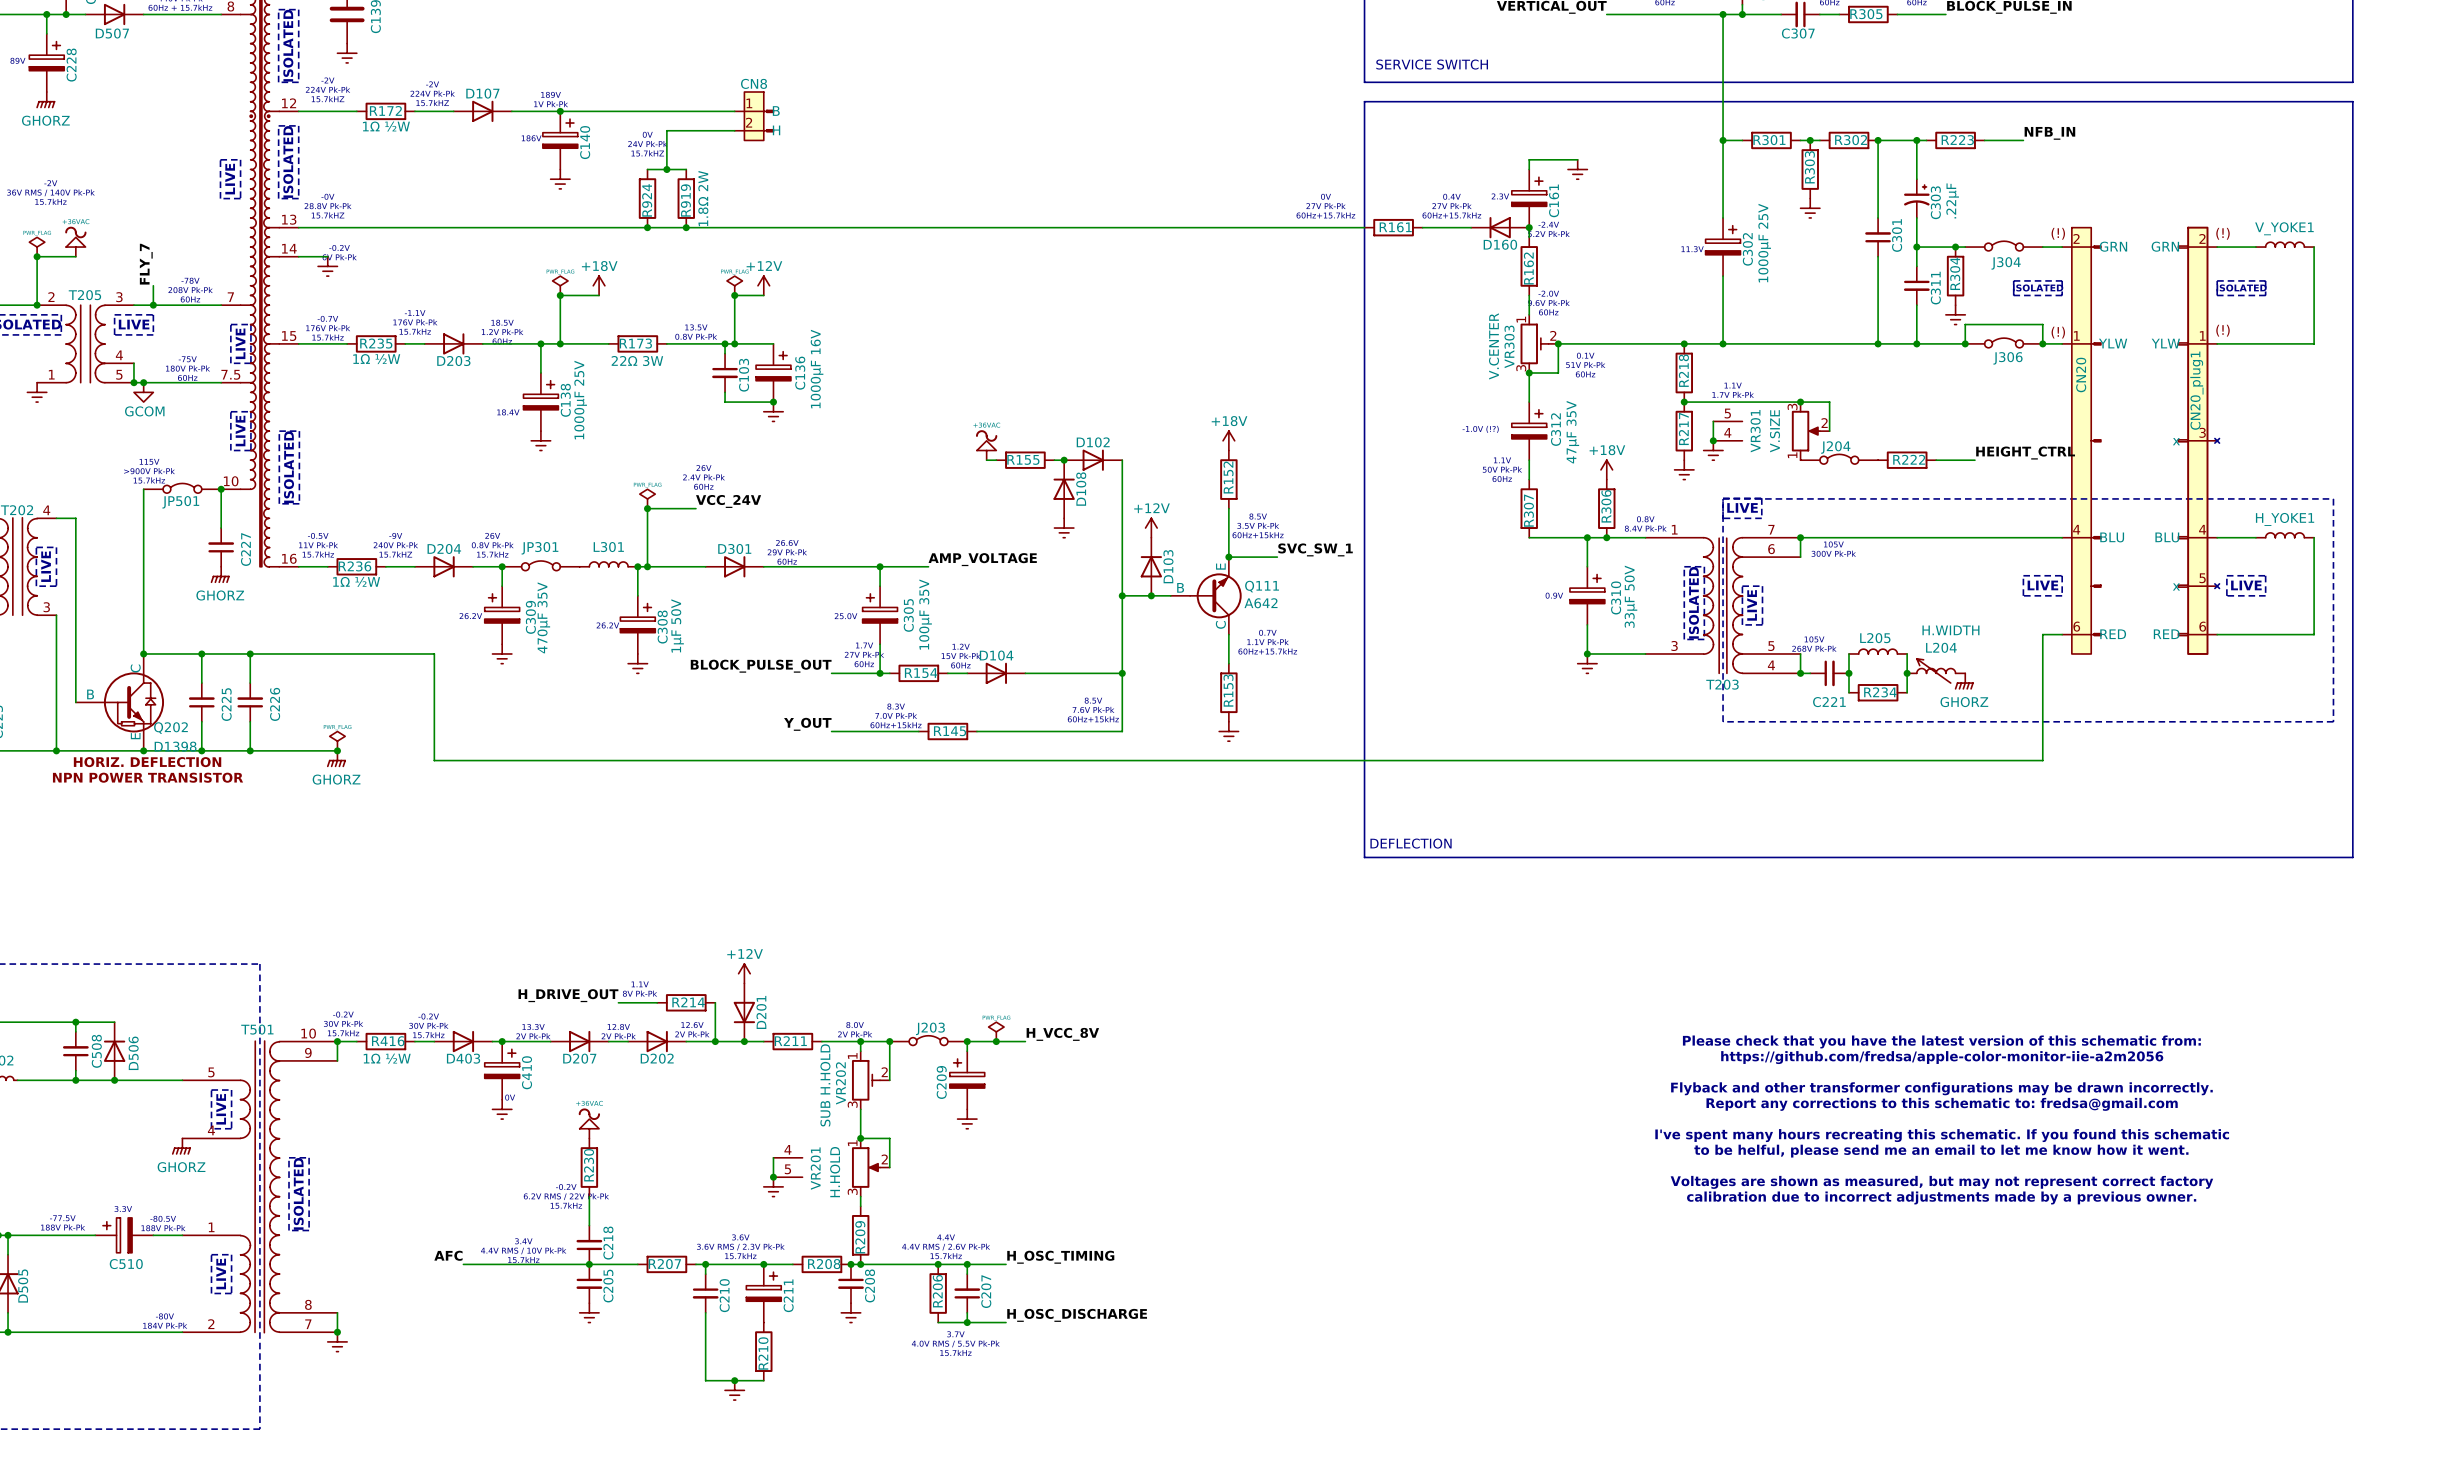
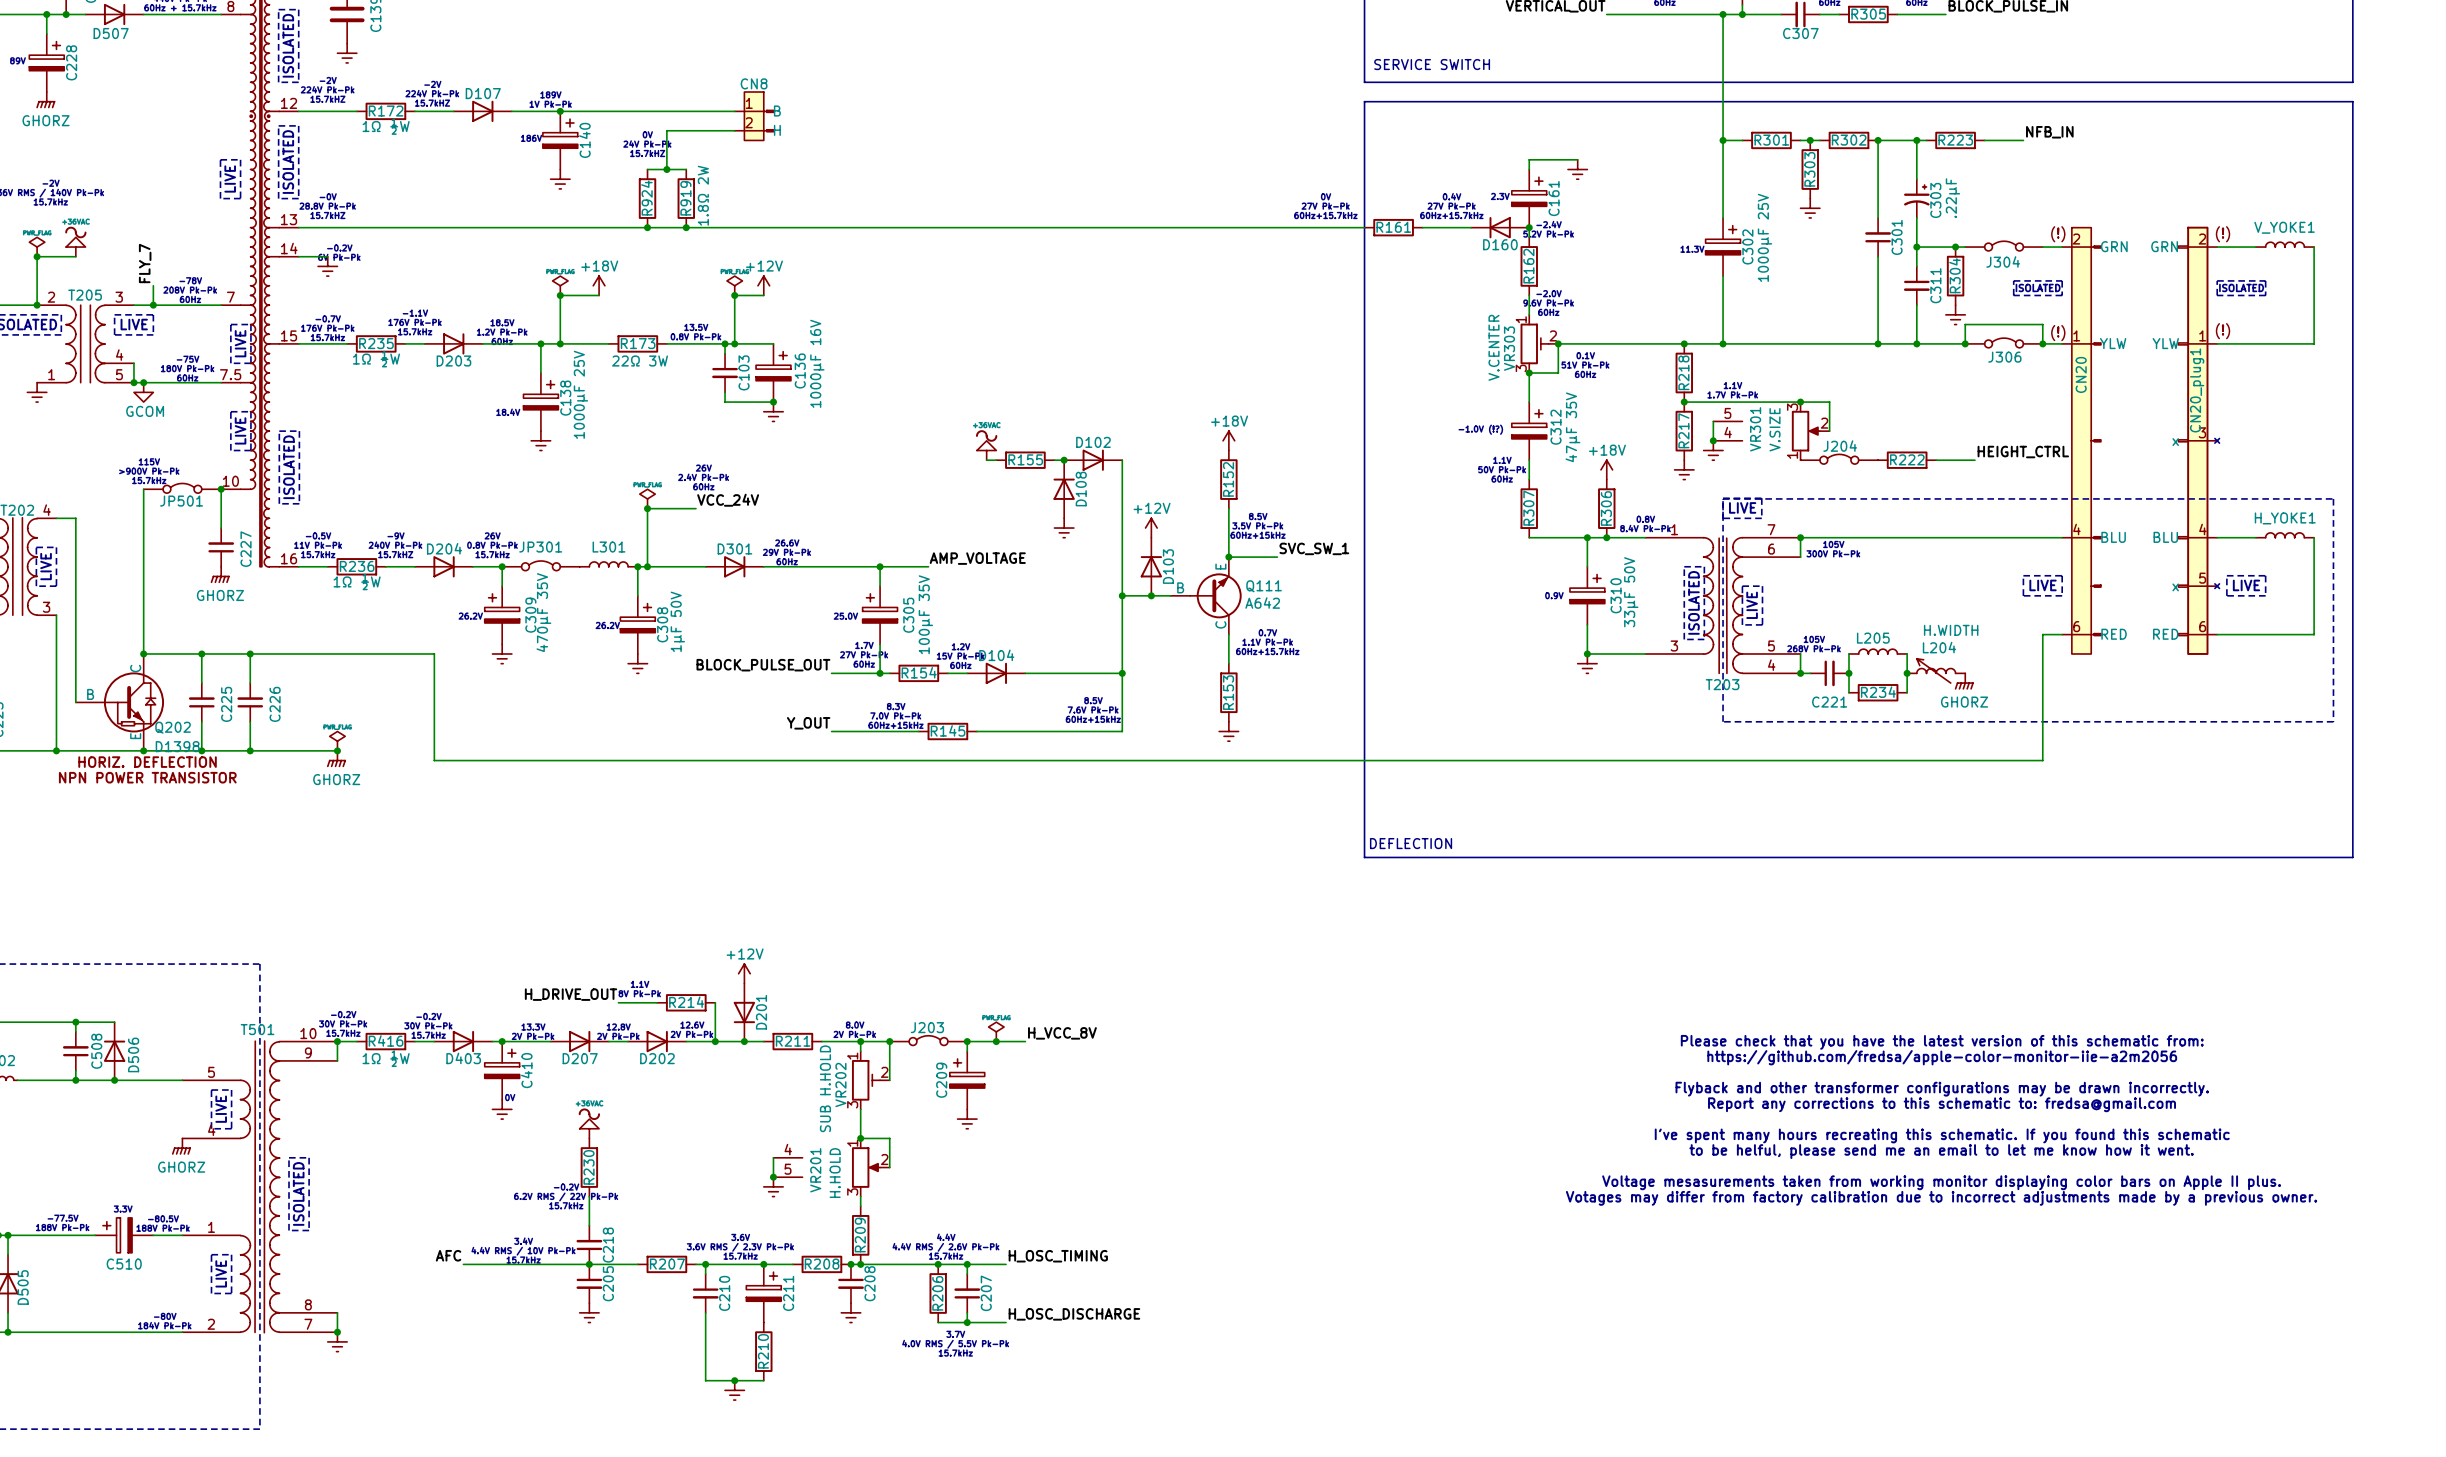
text: Voltages are shown as measured, but may not represent correct factory (1941, 1182) -> Voltage mesasurements taken from working monitor displaying color bars on Apple II plus. (1941, 1182)
text: calibration due to incorrect adjustments made by a previous owner. (1941, 1197) -> Votages may differ from factory calibration due to incorrect adjustments made by a previous owner. (1941, 1198)

